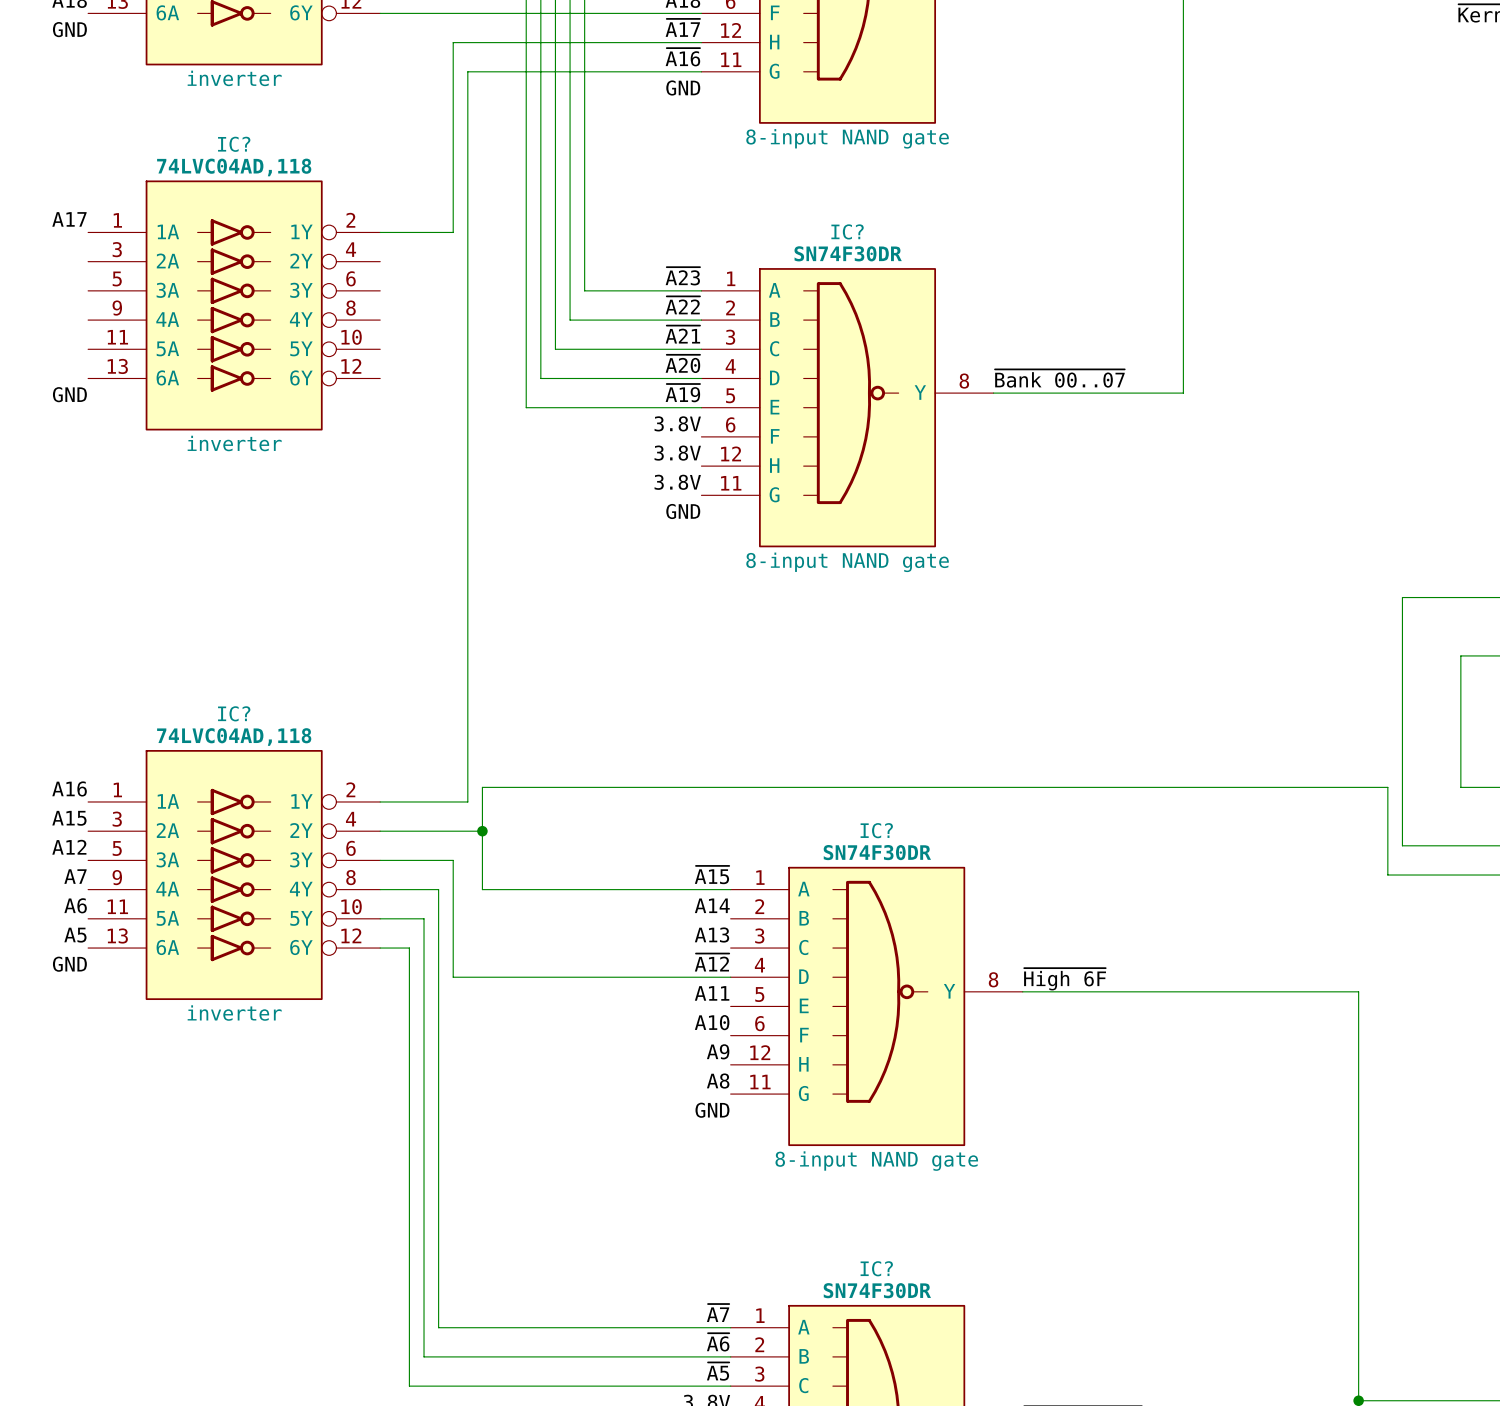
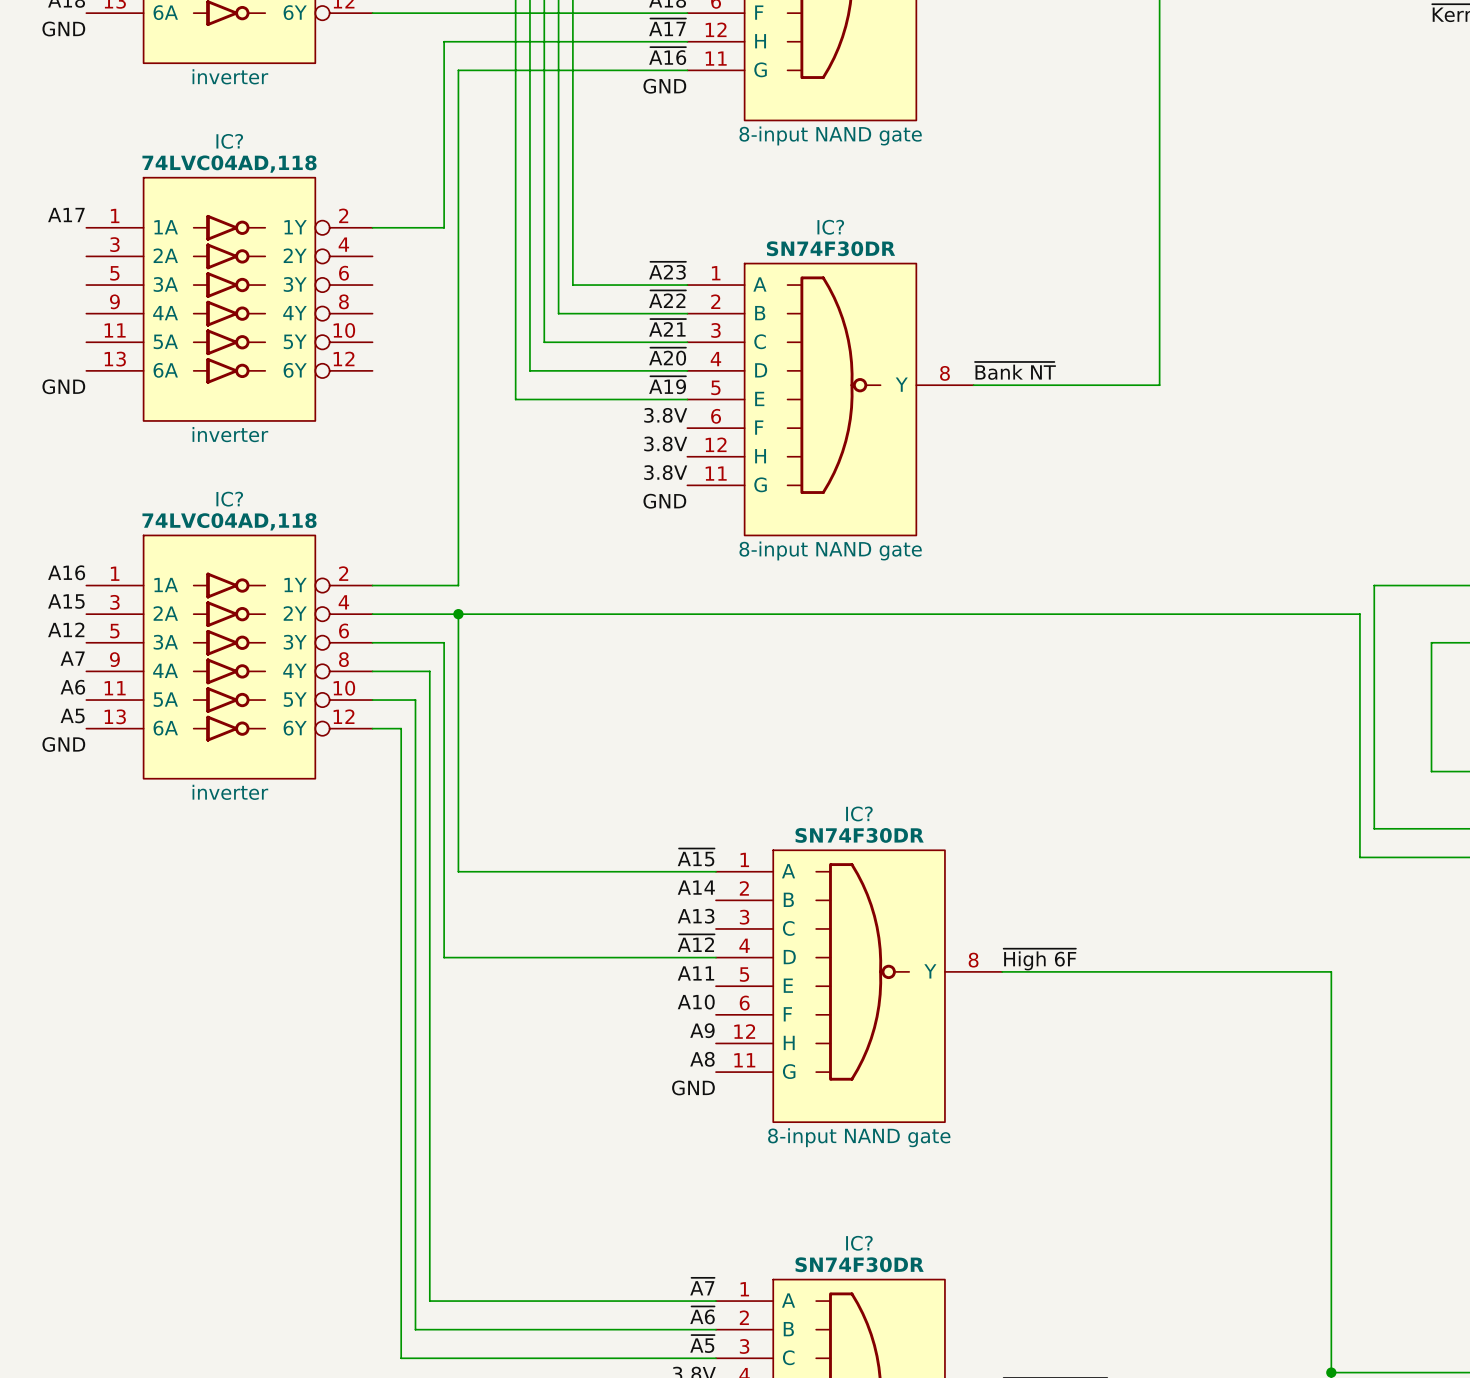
label: ~{Bank 00..07} (1059, 378) -> ~{Bank NT} (1015, 370)
wire: (467, 597) (467, 626) -> (458, 585) (372, 585)
junction: none -> (458, 614)
wire: (1387, 787) (482, 787) (482, 889) -> (1359, 771) (1359, 614) (372, 614)
label position: A16 (69, 788) -> A16 (66, 572)
wire: (380, 801) (467, 801) -> (472, 871) (458, 871) (458, 785)
label position: A15 (69, 818) -> A15 (66, 601)
wire: (380, 831) (482, 831) -> none
junction: (482, 831) -> none
label position: A12 (69, 847) -> A12 (66, 629)
wire: (380, 860) (453, 860) -> (372, 642) (444, 642) (444, 843)
IC? position: (234, 875) -> (229, 657)
label position: A7 (75, 876) -> A7 (72, 658)
wire: (380, 889) (438, 889) -> (372, 671) (429, 671) (429, 871)
label position: A6 (75, 905) -> A6 (72, 687)
wire: (380, 918) (424, 918) -> (372, 700) (415, 700) (415, 900)
label position: A5 (75, 935) -> A5 (72, 716)
wire: (380, 948) (409, 948) -> (372, 728) (401, 728) (401, 928)
label position: GND (69, 964) -> GND (63, 744)

